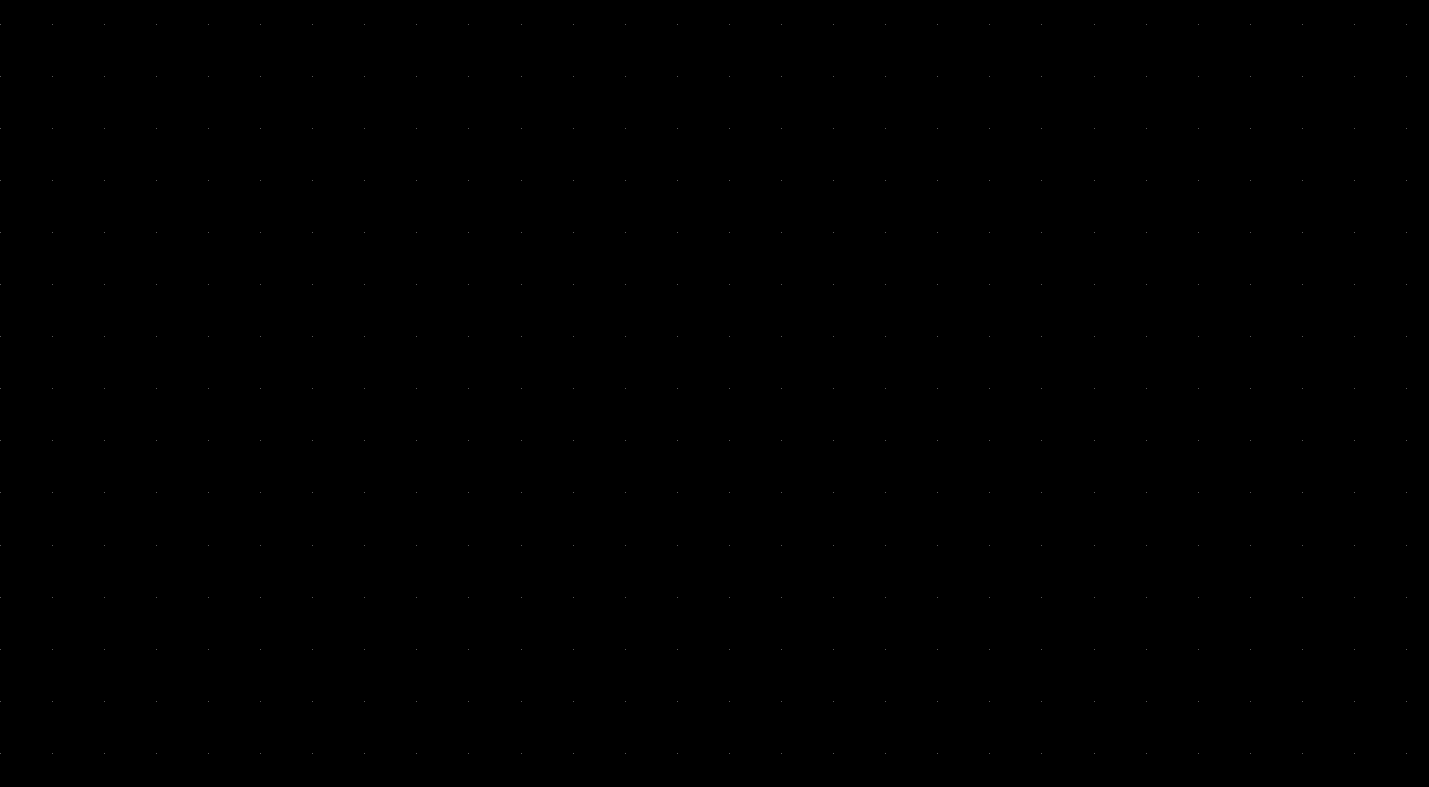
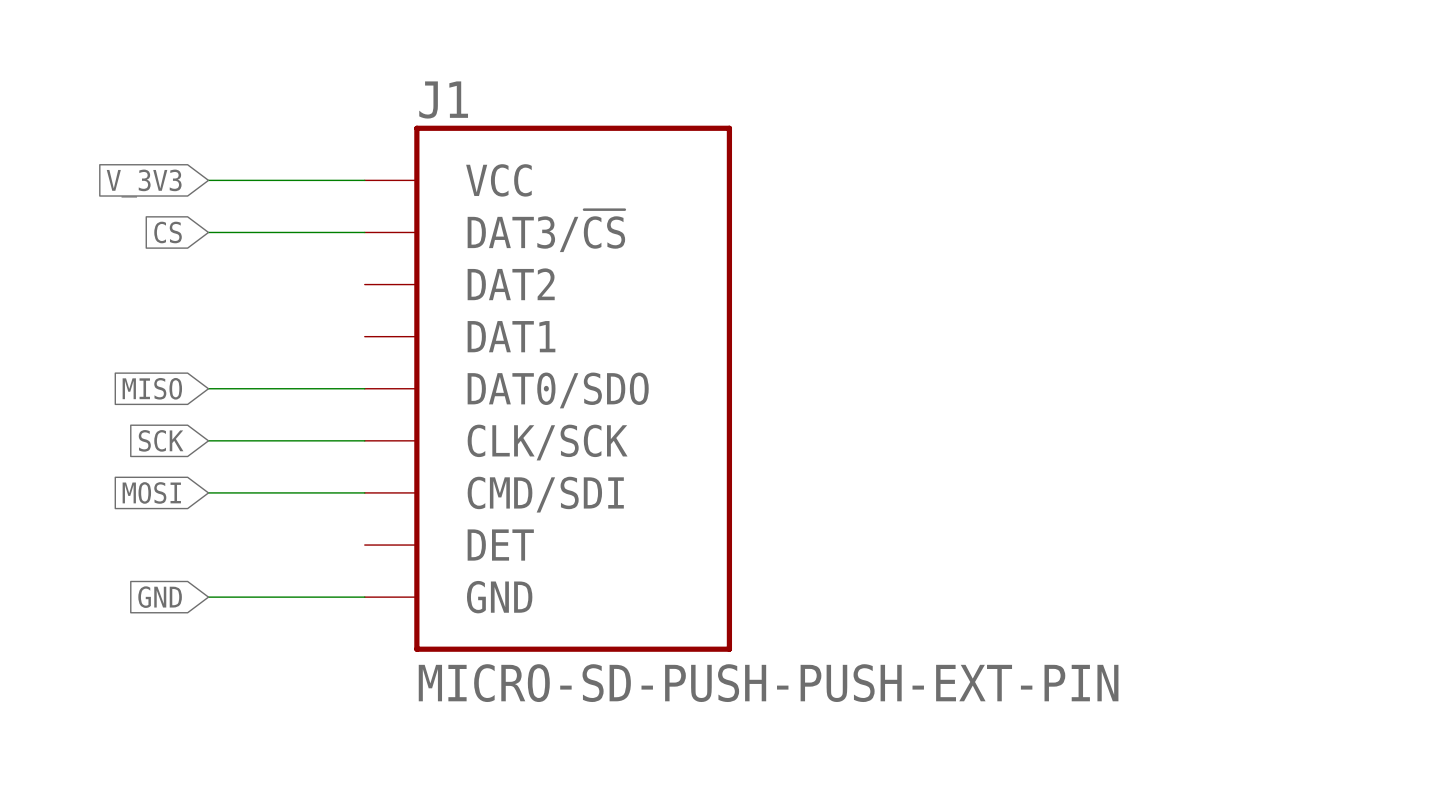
wire: none -> (208, 180) (364, 180)
global label: none -> V_3V3 (144, 183)
global label: none -> CS (168, 232)
wire: none -> (208, 232) (364, 232)
global label: none -> MISO (152, 388)
wire: none -> (208, 388) (364, 388)
J1: none -> MICRO-SD-PUSH-PUSH-EXT-PIN (548, 388)
global label: none -> SCK (161, 440)
wire: none -> (208, 440) (364, 440)
global label: none -> MOSI (151, 492)
wire: none -> (208, 492) (364, 492)
global label: none -> GND (160, 597)
wire: none -> (208, 597) (364, 597)

